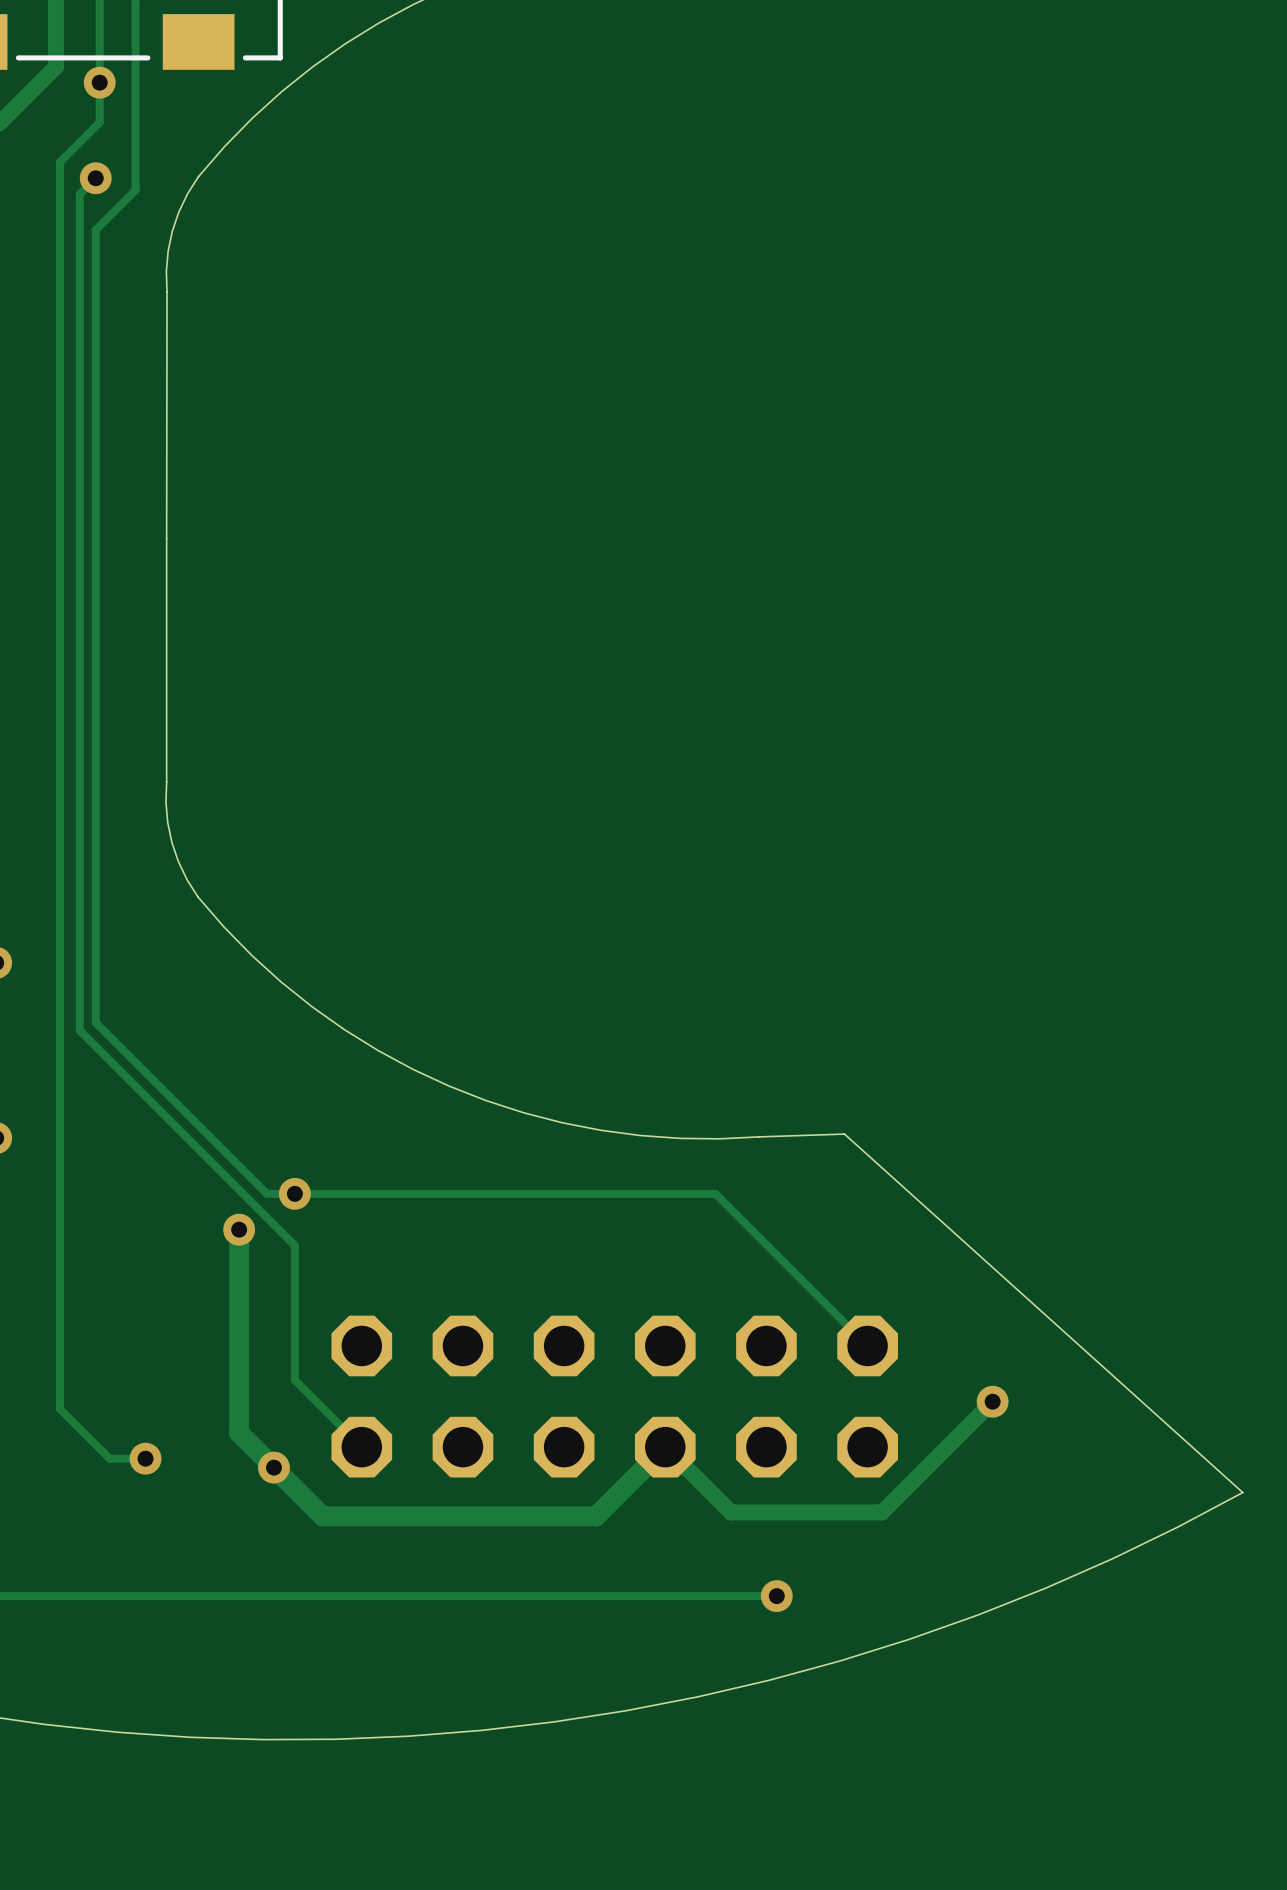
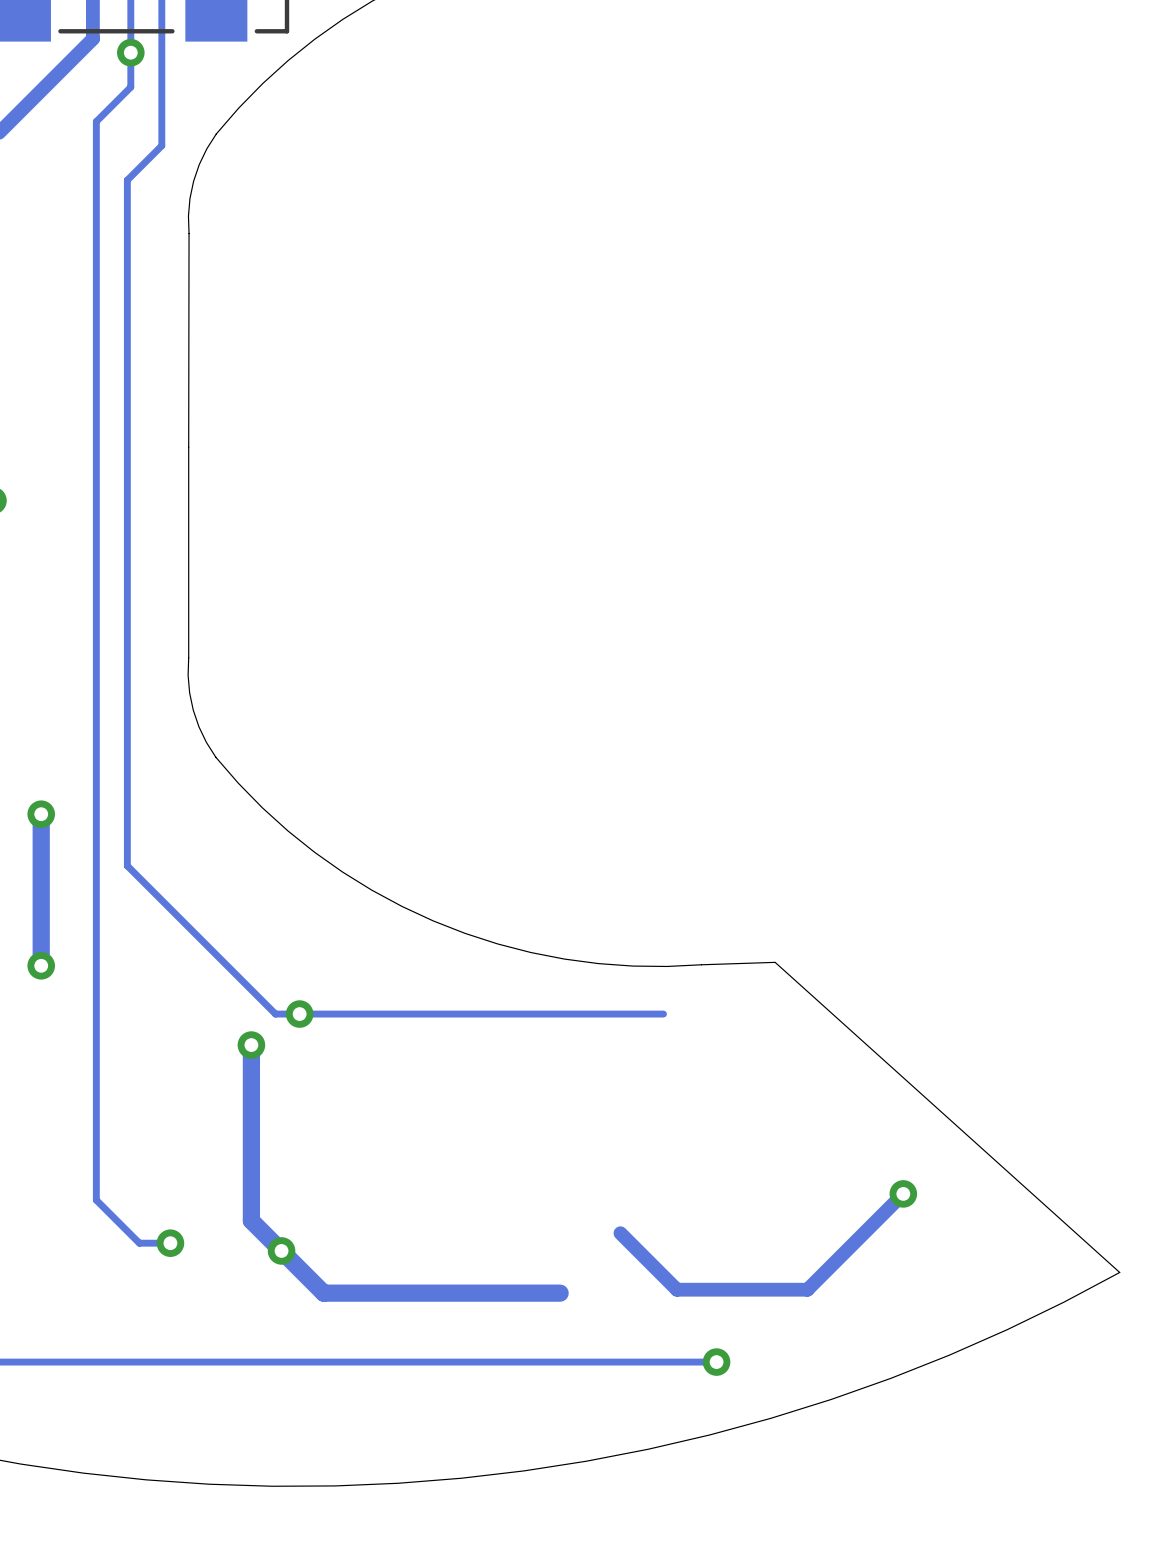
track: (95, 178) (79, 194) (79, 1030) (294, 1245) (294, 1380) (361, 1447) -> none
via: (95, 178) -> none
track: (715, 1193) (867, 1345) -> none
part: (614, 1396) -> none
track: (665, 1447) (595, 1516) -> none

